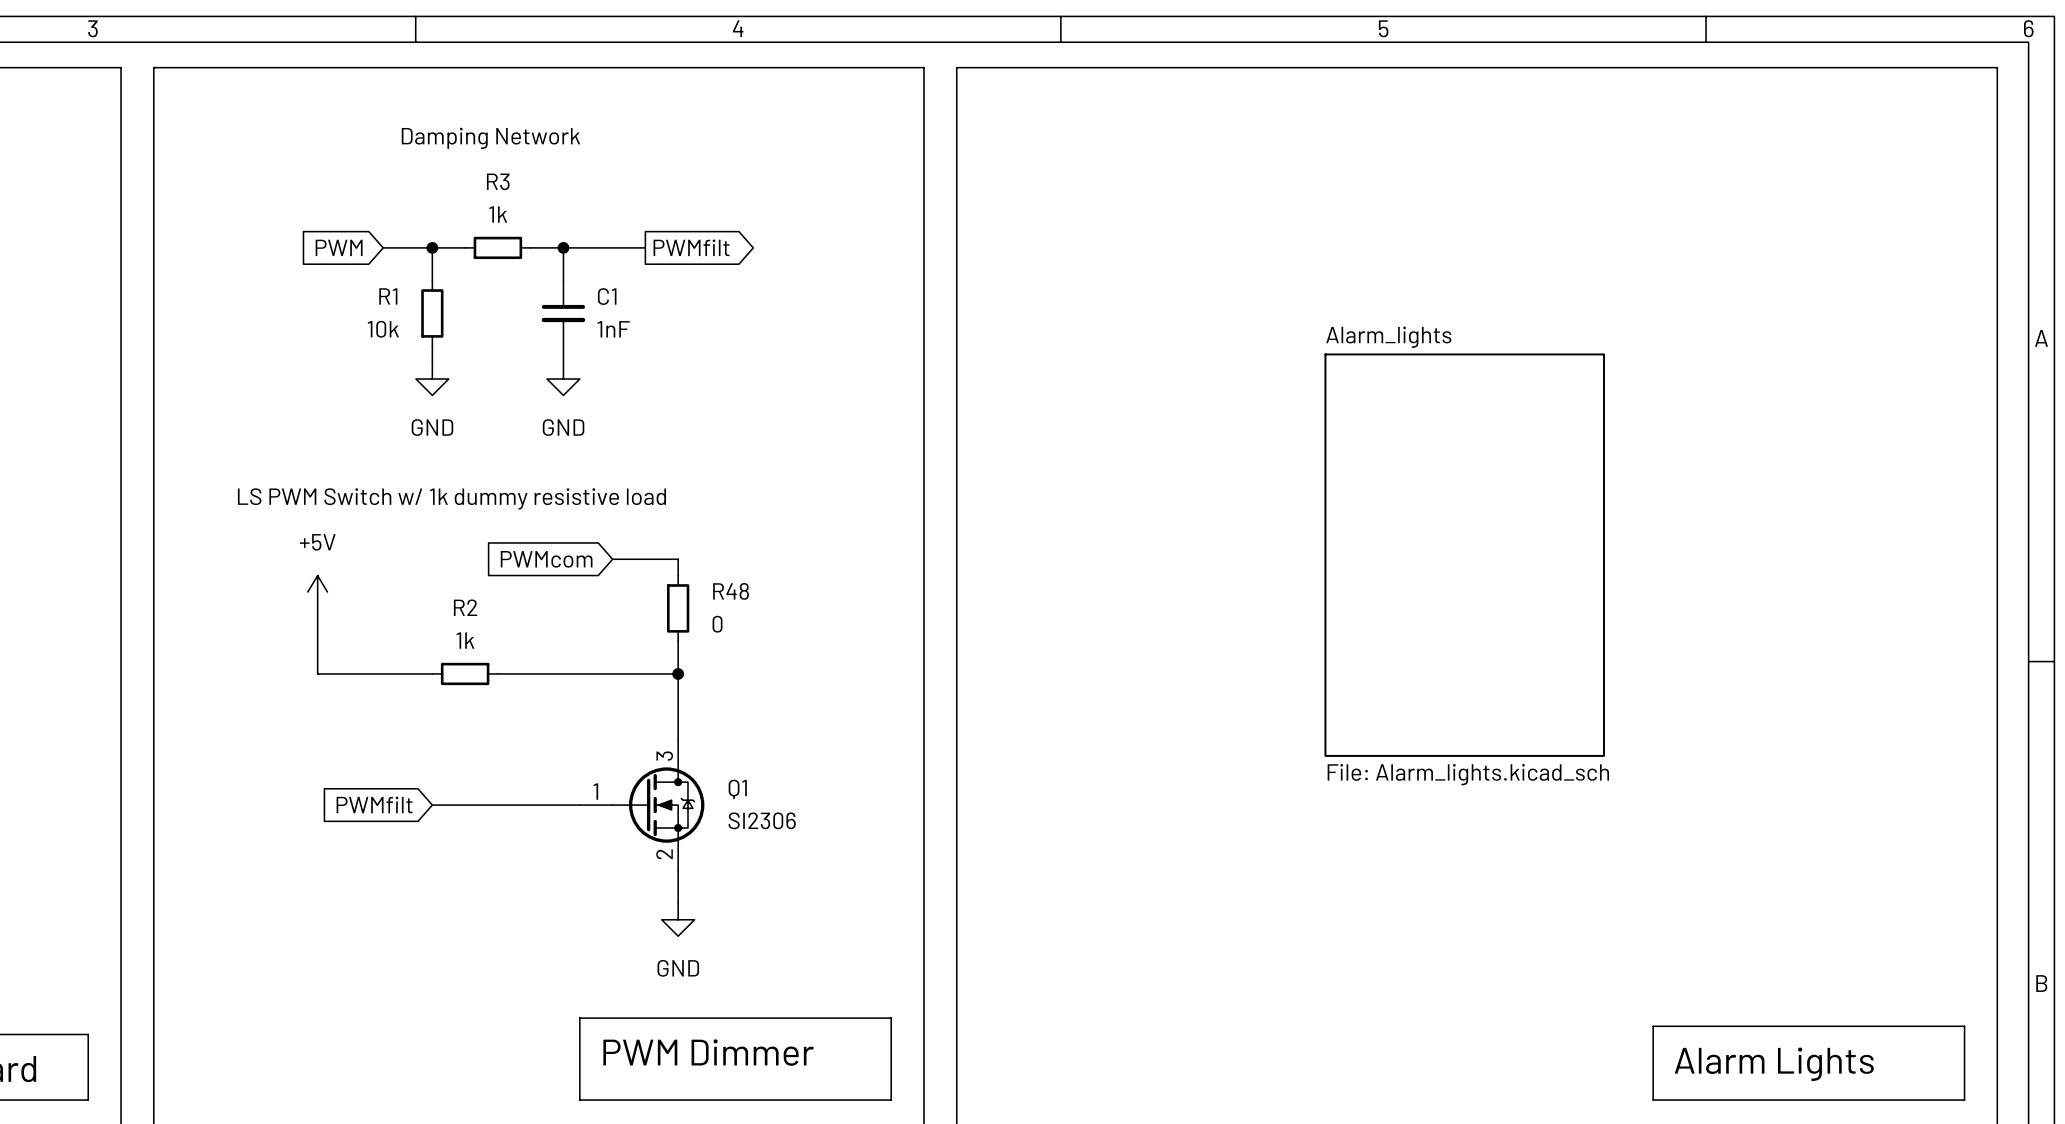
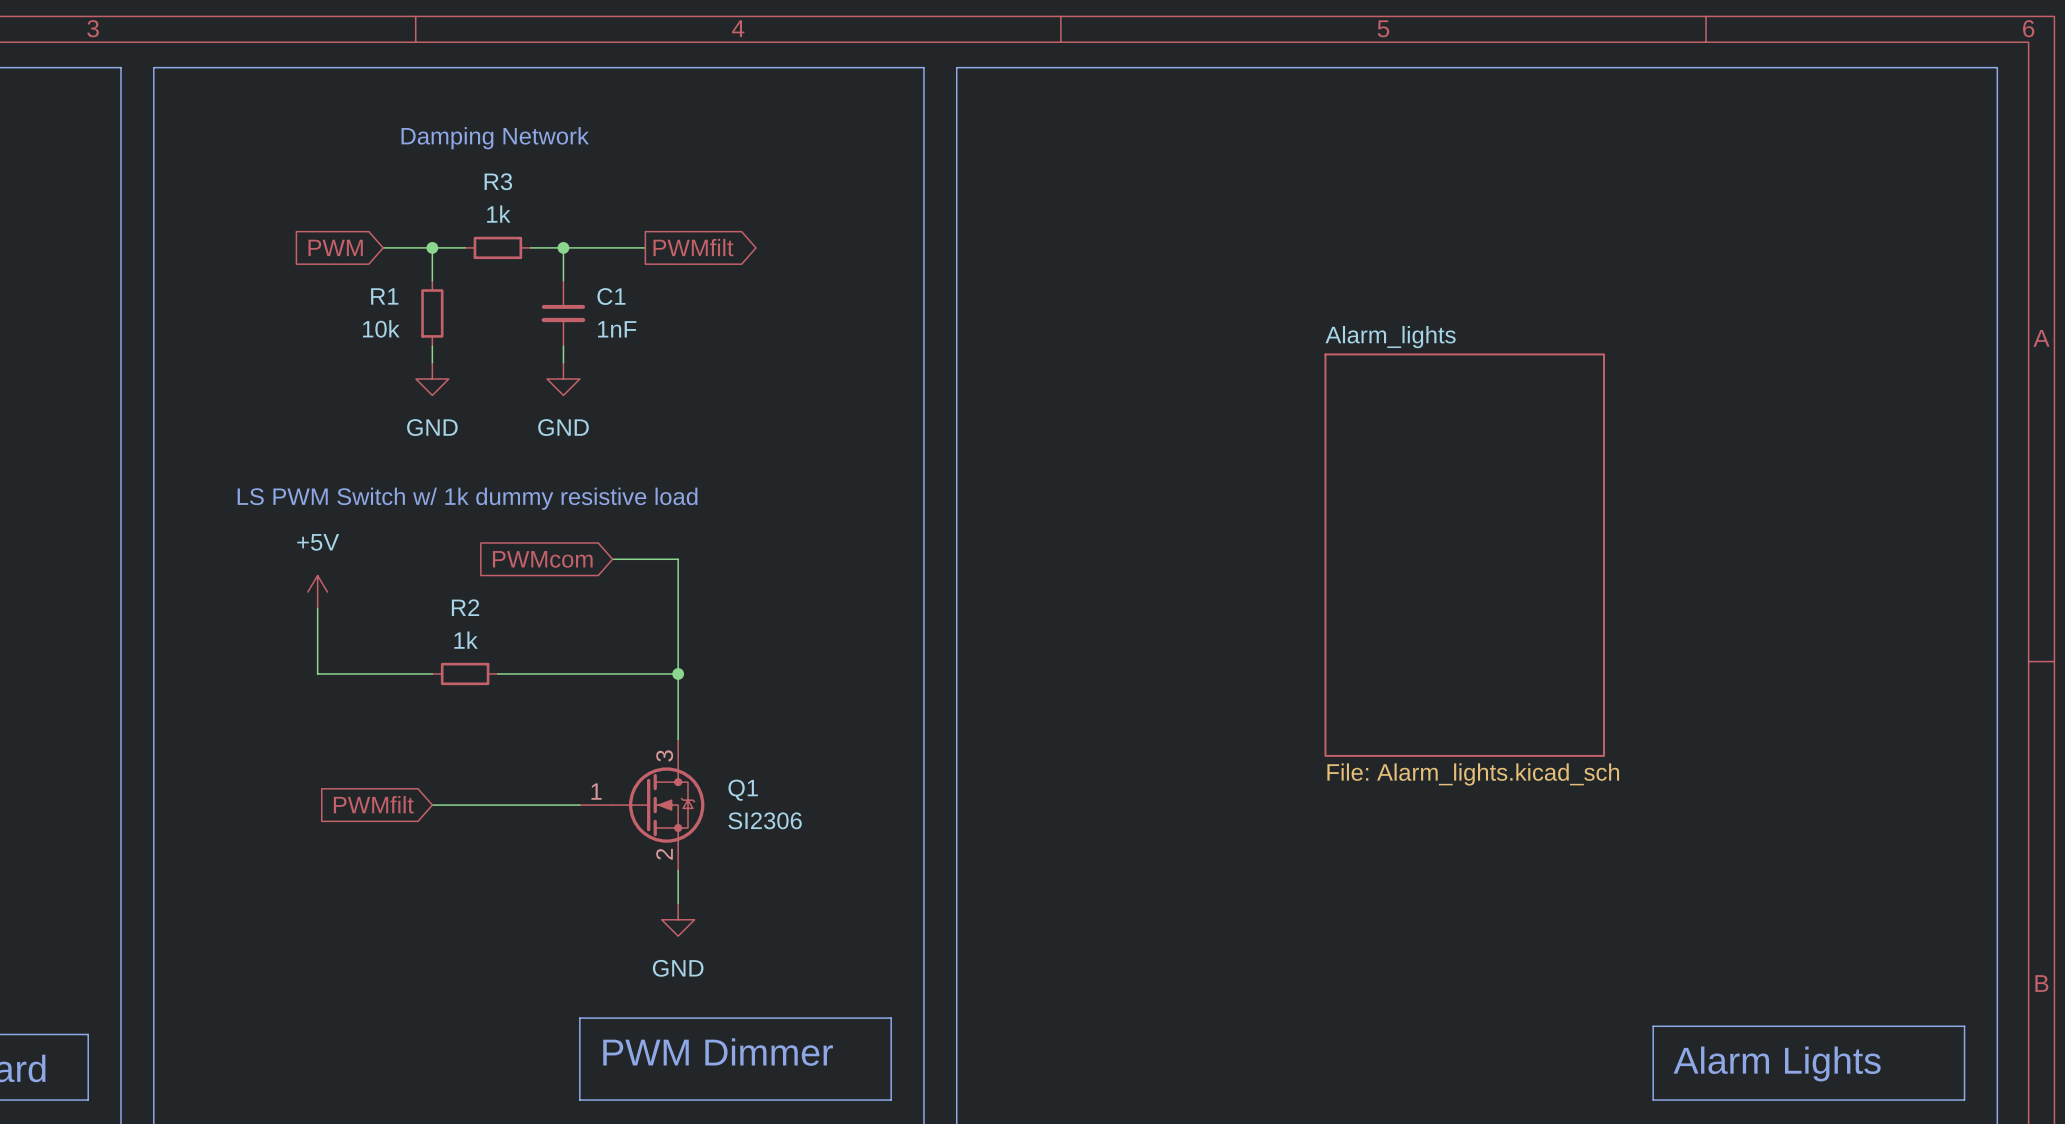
wire: none -> (678, 575) (678, 641)
R48: 0 (678, 608) -> none

